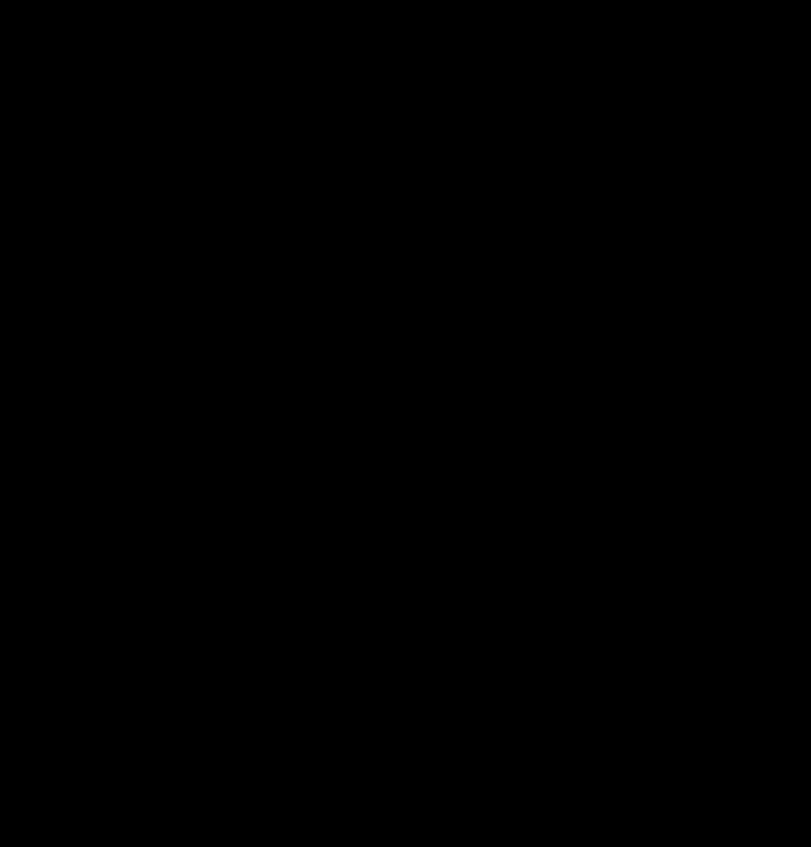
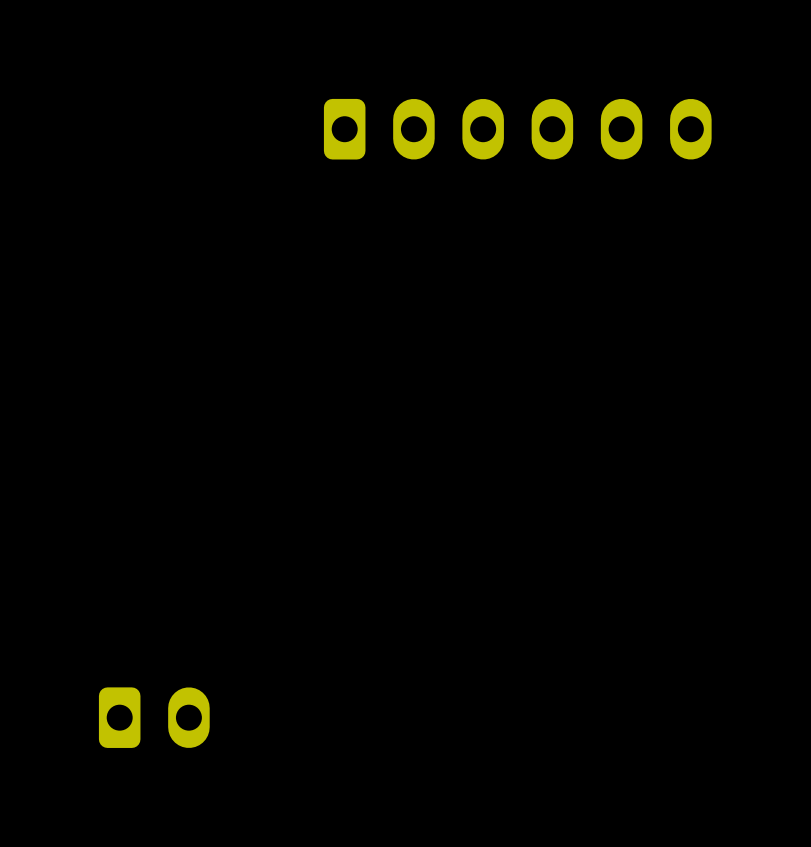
part: none -> (517, 129)
part: none -> (154, 717)

